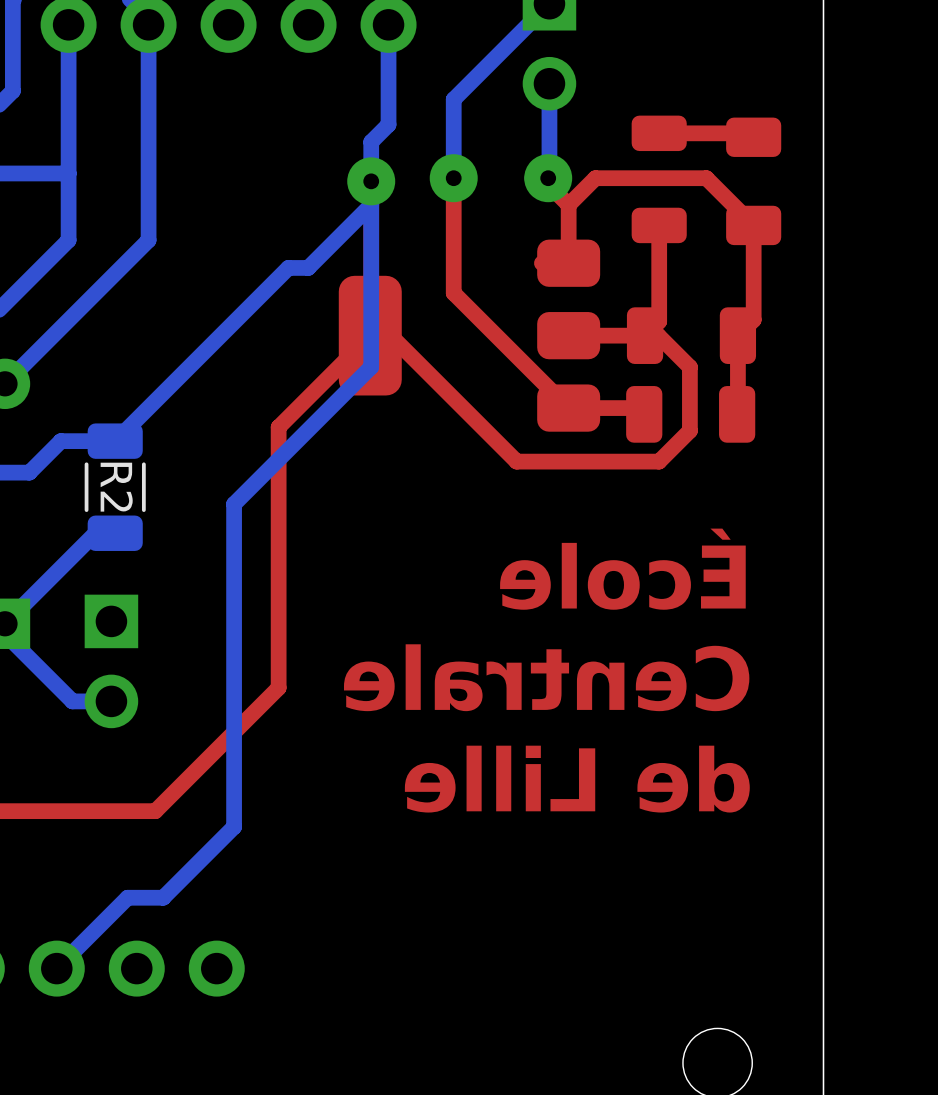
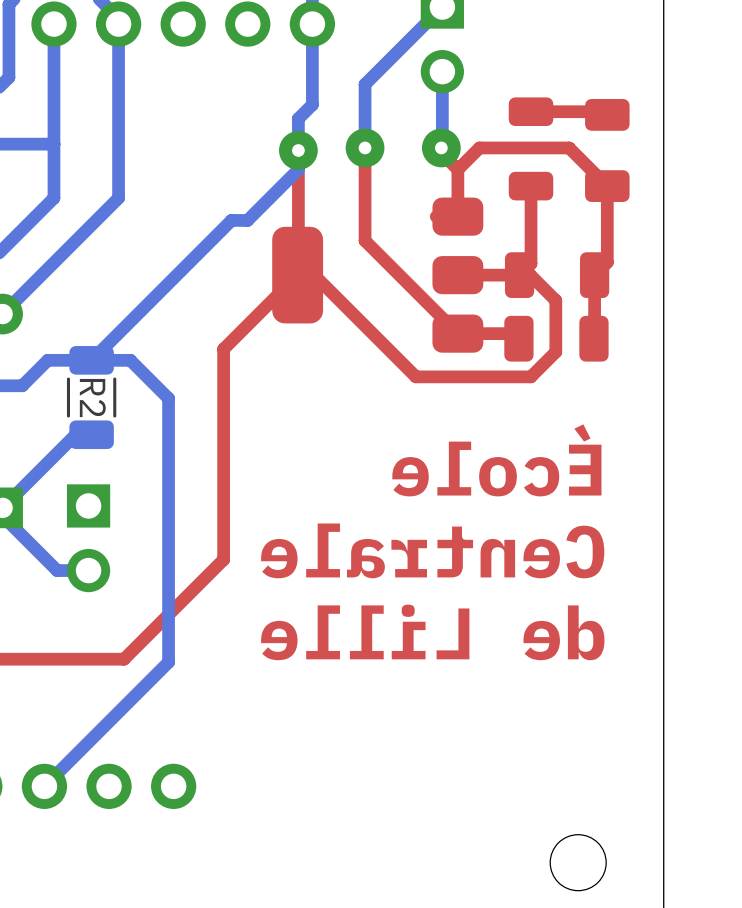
bottom track: (371, 204) (371, 366) (234, 504) (234, 826) (163, 897) (127, 897) -> (91, 360) (130, 360) (168, 398) (168, 662) (101, 729)

